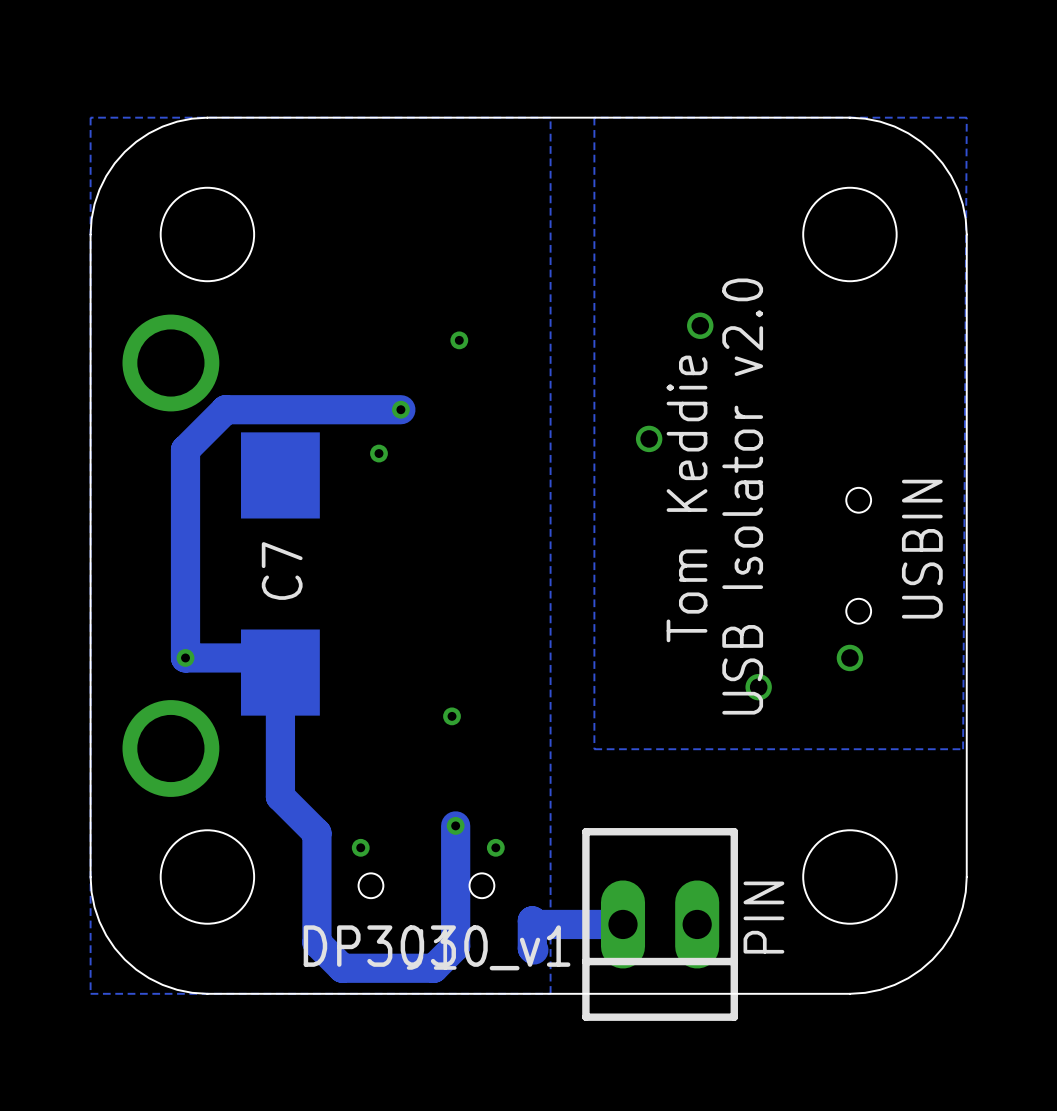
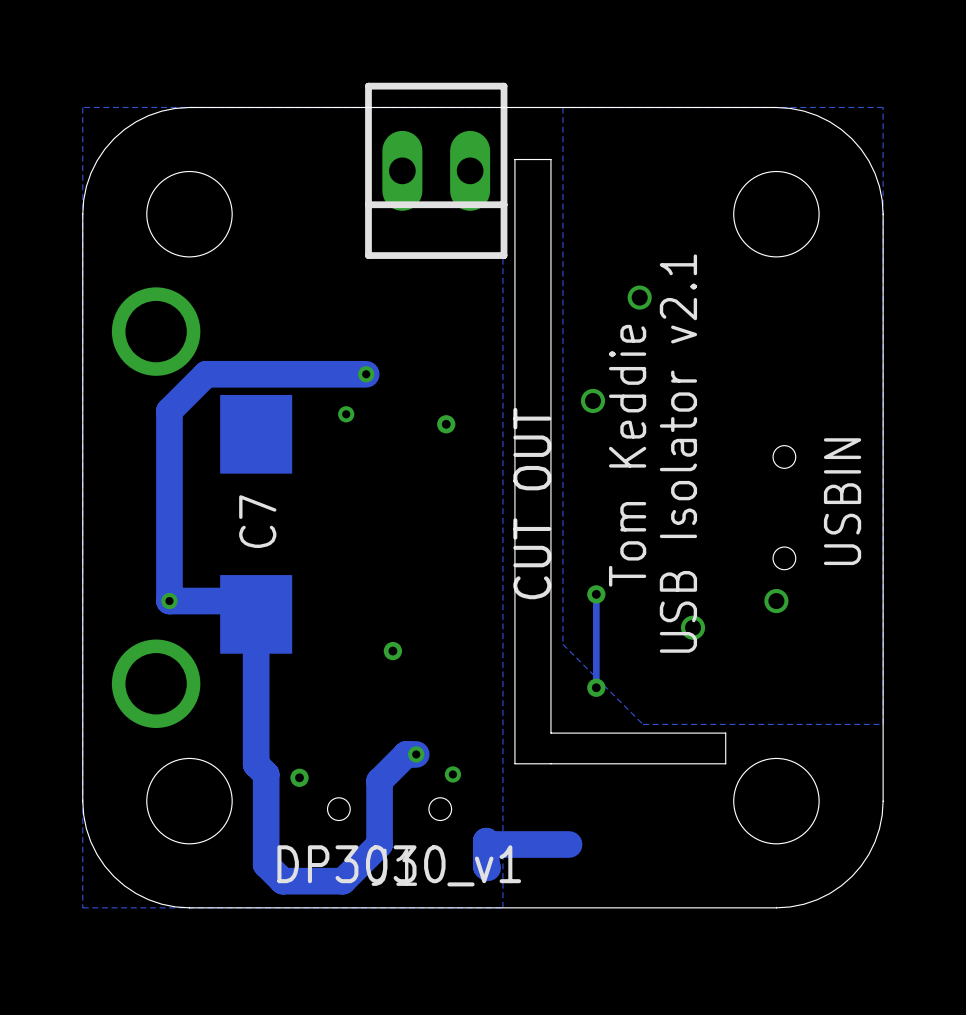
zone outline: (966, 117) (963, 749) (594, 749) (594, 117) (616, 117) -> (883, 107) (883, 724) (643, 724) (562, 644) (562, 107)
board edge: none -> (550, 159) (514, 159) (514, 763) (725, 763) (725, 733) (550, 733) (550, 159)
part: none -> (436, 170)
via: (459, 340) -> none
via: none -> (446, 424)
text: USB Isolator v2.0 (742, 496) -> USB Isolator v2.1 (678, 453)
text: none -> CUT OUT (532, 503)
track: none -> (596, 594) (596, 687)
via: none -> (596, 594)
via: none -> (392, 651)
via: (452, 716) -> none
via: none -> (596, 687)
track: (280, 796) (316, 833) (316, 942) (342, 968) (433, 968) (455, 946) (455, 825) -> (256, 727) (256, 764) (266, 774) (266, 864) (282, 881) (342, 881) (379, 844) (379, 781) (406, 754) (416, 754)
via: (360, 847) -> none
via: none -> (299, 777)
PIN: (660, 924) -> none

